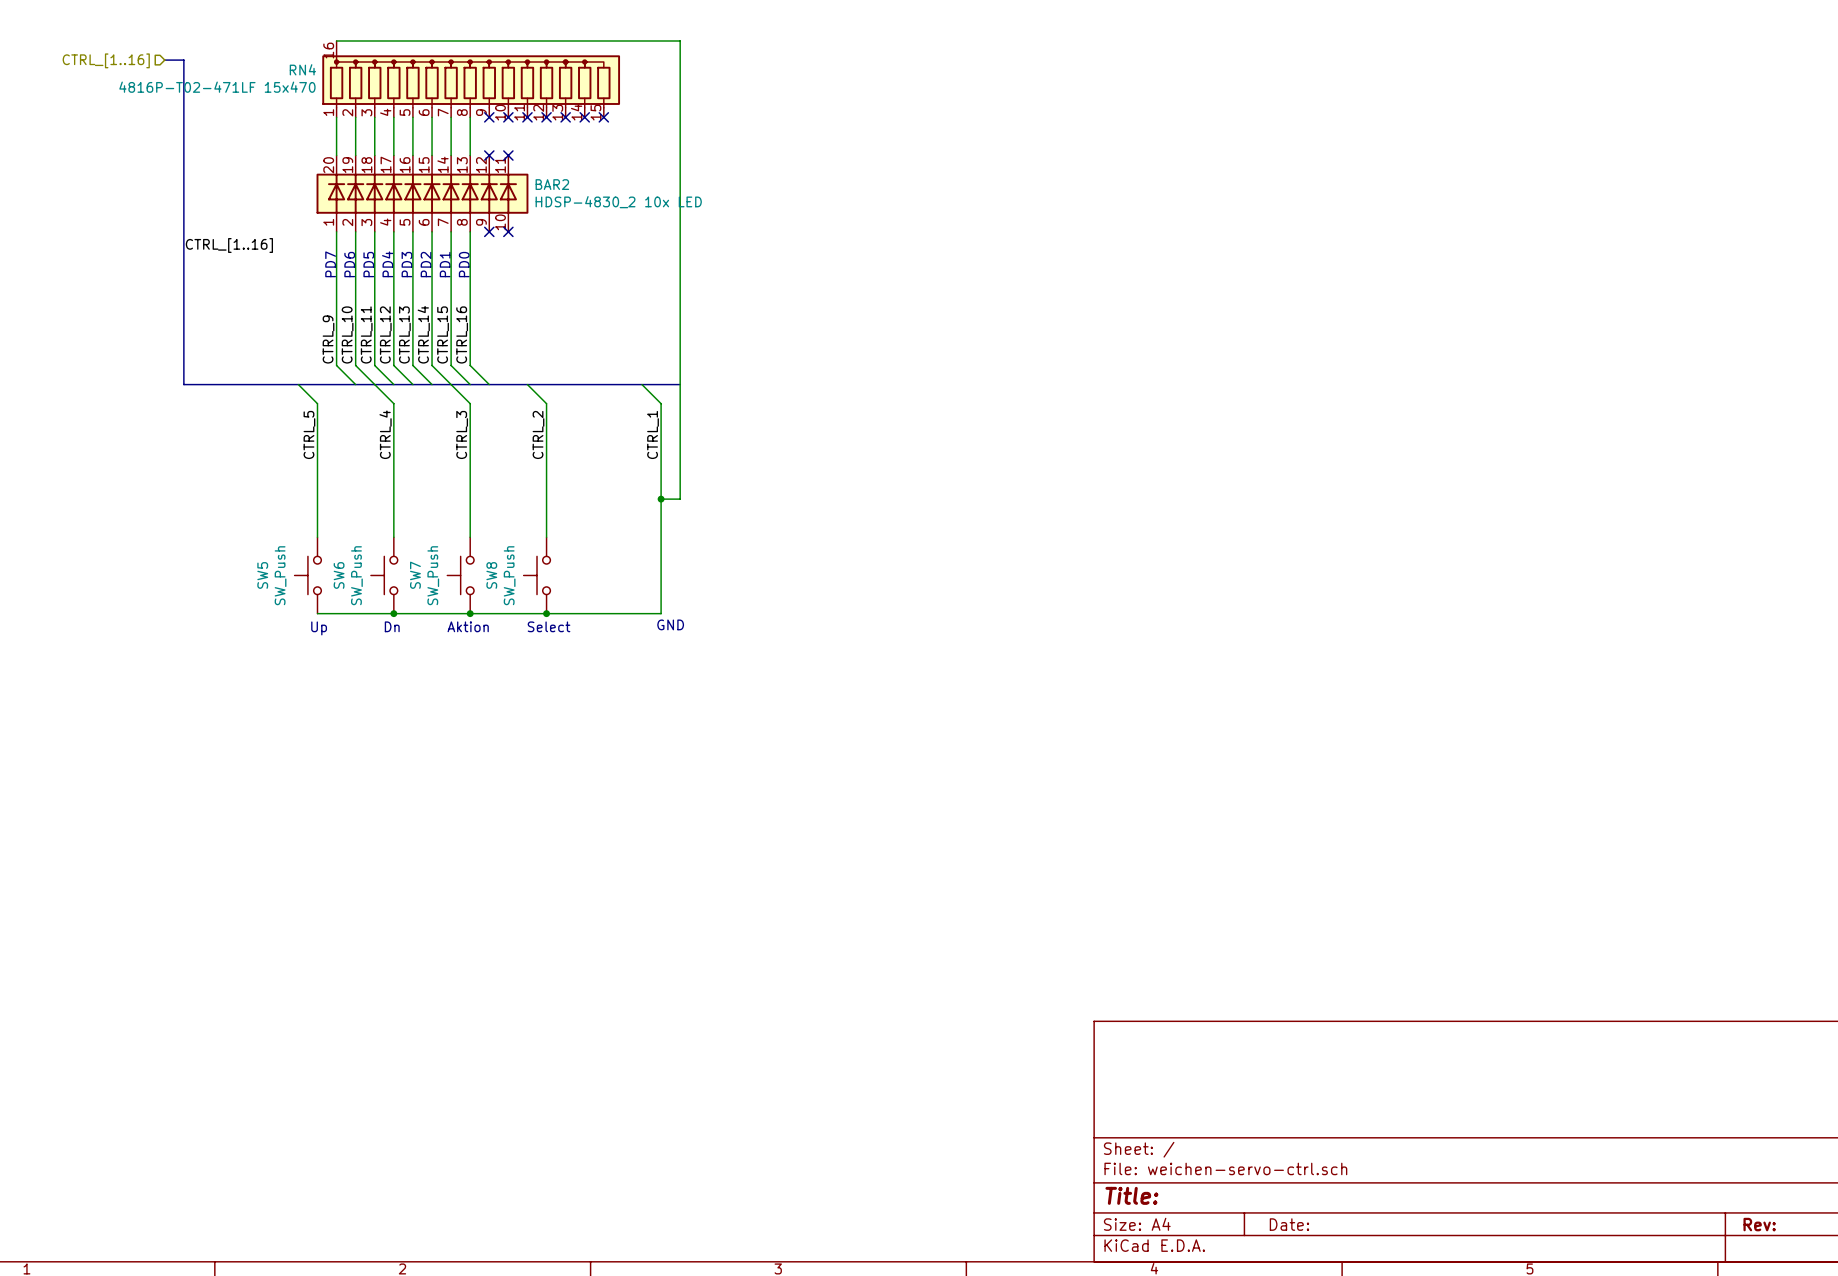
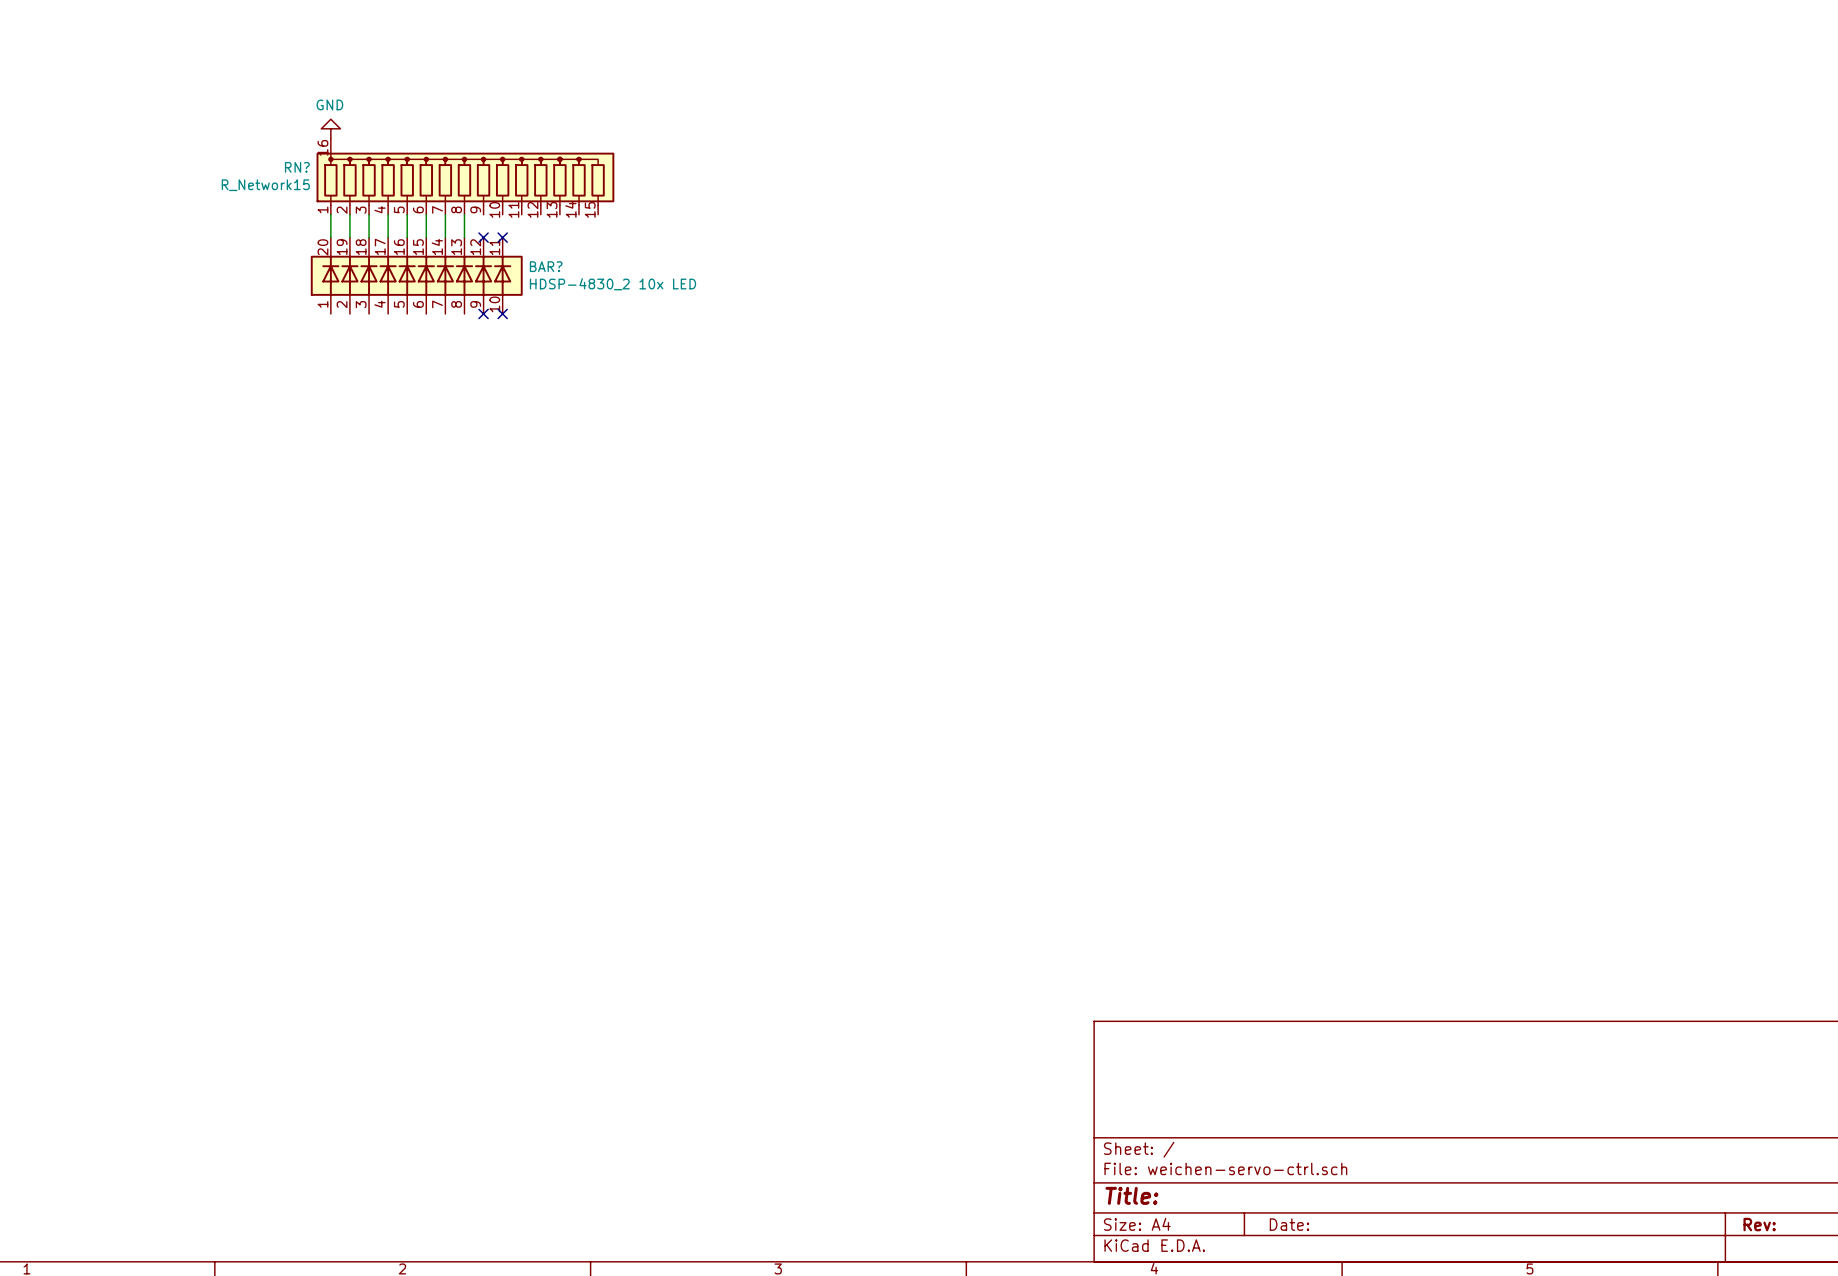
wire: (336, 40) (680, 40) (680, 499) (661, 499) -> none
hierarchical label: CTRL_[1..16] (106, 60) -> none
bus: (164, 60) (183, 60) (183, 384) (680, 384) -> none
RN4: 4816P-T02-471LF 15x470 (471, 79) -> none
wire: (336, 117) (336, 155) -> none
wire: (355, 117) (355, 155) -> none
wire: (374, 117) (374, 155) -> none
wire: (393, 117) (393, 155) -> none
wire: (412, 117) (412, 155) -> none
wire: (432, 117) (432, 155) -> none
wire: (451, 117) (451, 155) -> none
wire: (470, 117) (470, 155) -> none
no-connect mark: (489, 117) -> none
no-connect mark: (508, 117) -> none
no-connect mark: (527, 117) -> none
no-connect mark: (546, 117) -> none
no-connect mark: (565, 117) -> none
no-connect mark: (584, 117) -> none
no-connect mark: (603, 117) -> none
power symbol: none -> GND (330, 128)
no-connect mark: (489, 155) -> none
no-connect mark: (508, 155) -> none
RN?: none -> R_Network15 (465, 176)
BAR2: HDSP-4830_2 10x LED (422, 193) -> none
wire: none -> (330, 214) (330, 237)
wire: none -> (349, 214) (349, 237)
wire: none -> (369, 214) (369, 237)
wire: none -> (388, 214) (388, 237)
wire: none -> (407, 214) (407, 237)
wire: none -> (426, 214) (426, 237)
wire: none -> (445, 214) (445, 237)
wire: none -> (464, 214) (464, 237)
wire: (336, 231) (336, 365) (355, 384) -> none
wire: (355, 231) (355, 365) (393, 403) (393, 537) -> none
wire: (374, 231) (374, 365) (393, 384) -> none
wire: (393, 231) (393, 365) (412, 384) -> none
wire: (412, 231) (412, 365) (432, 384) -> none
wire: (432, 231) (432, 365) (470, 403) (470, 537) -> none
wire: (451, 231) (451, 365) (470, 384) -> none
wire: (470, 231) (470, 365) (489, 384) -> none
no-connect mark: (489, 231) -> none
no-connect mark: (508, 231) -> none
no-connect mark: none -> (483, 237)
no-connect mark: none -> (502, 237)
label: CTRL_[1..16] (229, 245) -> none
text: PD7 (330, 264) -> none
text: PD6 (349, 264) -> none
text: PD5 (368, 264) -> none
text: PD4 (387, 264) -> none
text: PD3 (406, 264) -> none
text: PD2 (426, 264) -> none
text: PD1 (445, 264) -> none
text: PD0 (464, 264) -> none
BAR?: none -> HDSP-4830_2 10x LED (416, 275)
no-connect mark: none -> (483, 313)
no-connect mark: none -> (502, 313)
label: CTRL_10 (347, 334) -> none
label: CTRL_11 (366, 334) -> none
label: CTRL_12 (385, 334) -> none
label: CTRL_13 (404, 334) -> none
label: CTRL_14 (423, 334) -> none
label: CTRL_15 (443, 334) -> none
label: CTRL_16 (462, 334) -> none
label: CTRL_9 (328, 339) -> none
wire: (298, 384) (317, 403) (317, 537) -> none
wire: (527, 384) (546, 403) (546, 537) -> none
wire: (641, 384) (661, 403) (661, 613) (317, 613) -> none
label: CTRL_5 (309, 434) -> none
label: CTRL_4 (385, 434) -> none
label: CTRL_3 (462, 434) -> none
label: CTRL_2 (538, 434) -> none
label: CTRL_1 (653, 434) -> none
junction: (661, 499) -> none
SW5: SW_Push (307, 575) -> none
SW6: SW_Push (384, 575) -> none
SW7: SW_Push (460, 575) -> none
SW8: SW_Push (537, 575) -> none
junction: (393, 613) -> none
junction: (470, 613) -> none
junction: (546, 613) -> none
text: GND (670, 624) -> none
text: Dn (392, 626) -> none
text: Aktion (468, 626) -> none
text: Select (549, 626) -> none
text: Up (319, 628) -> none

